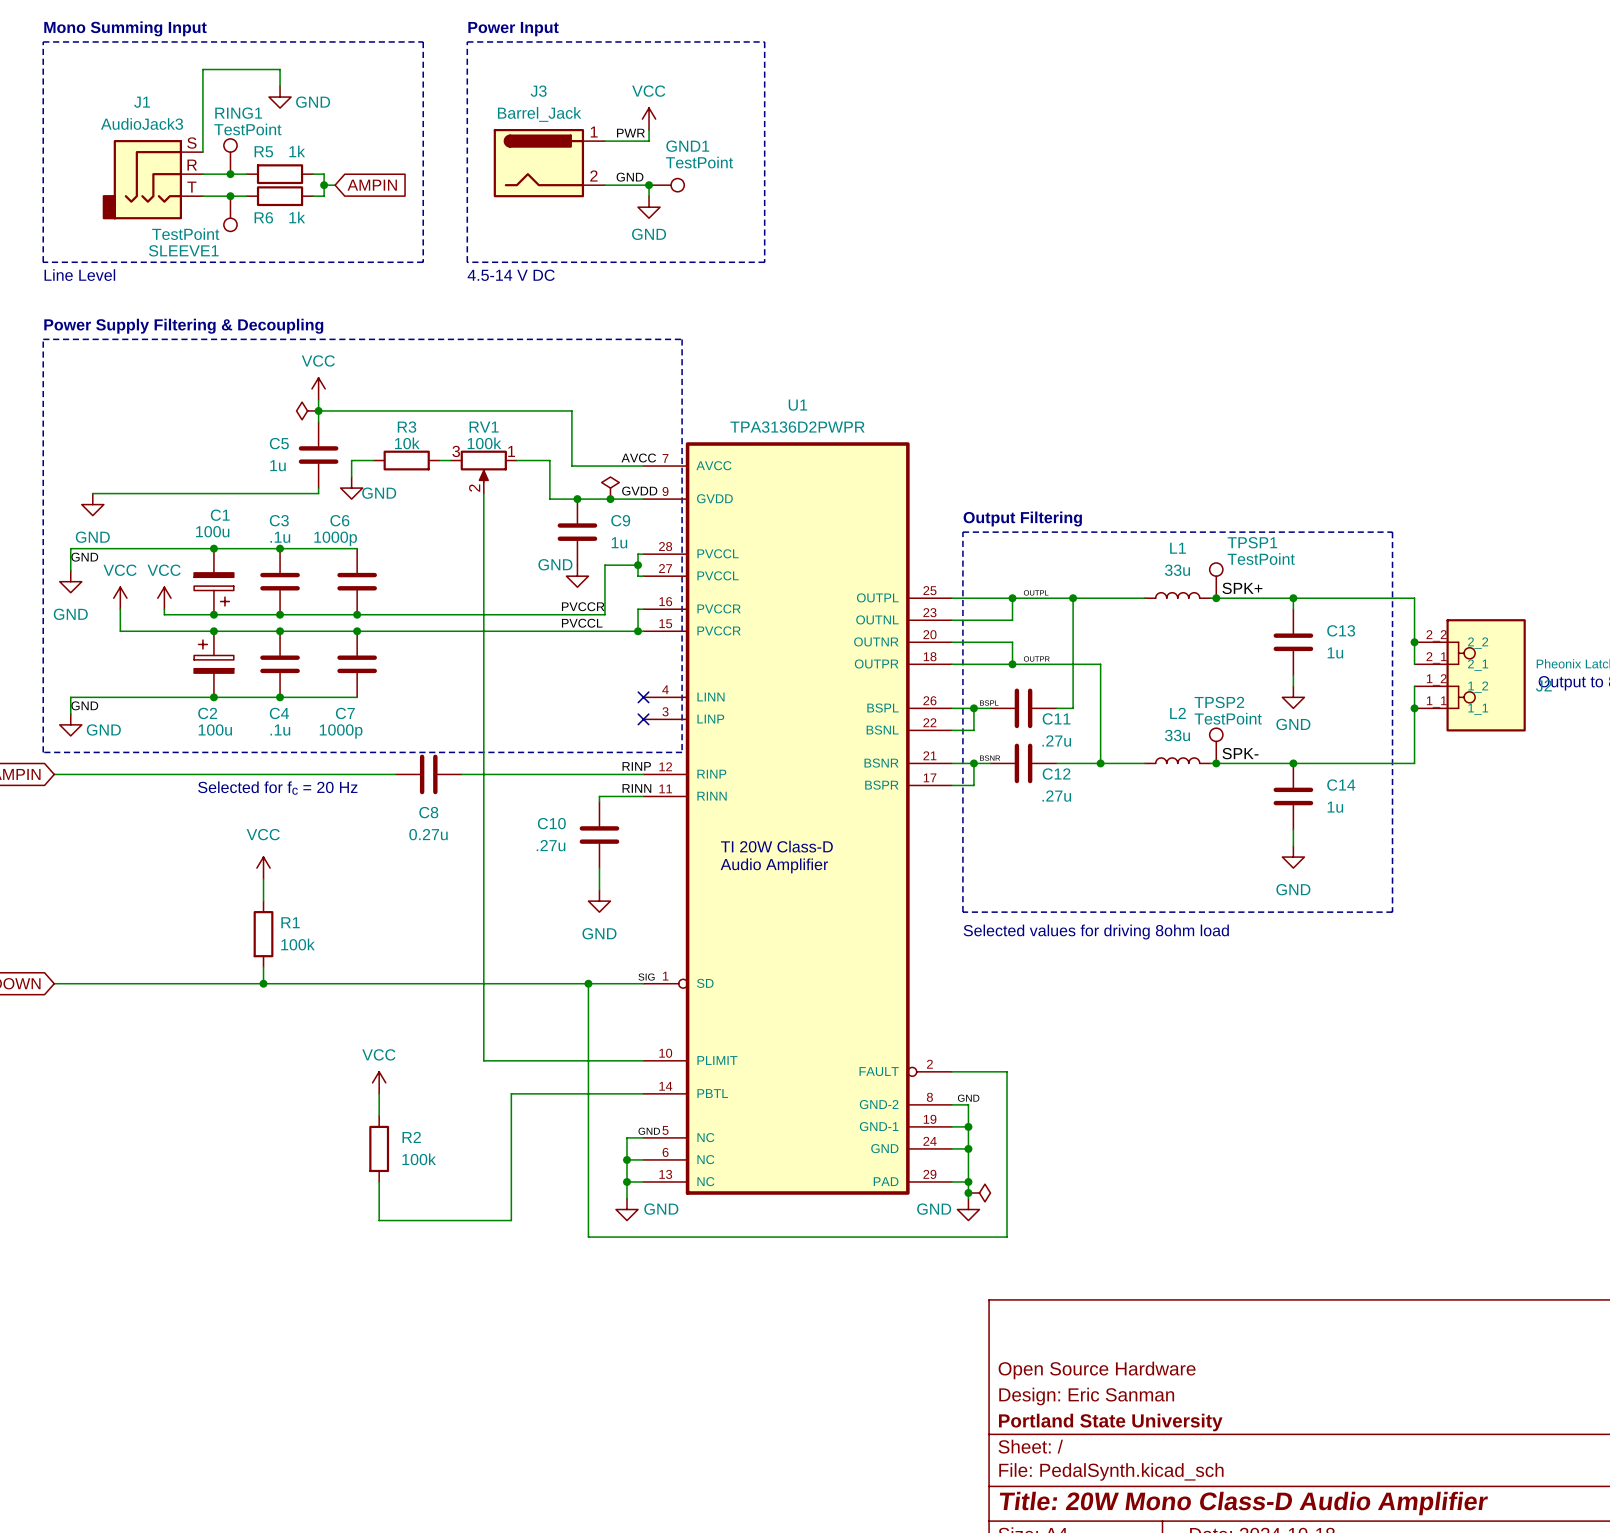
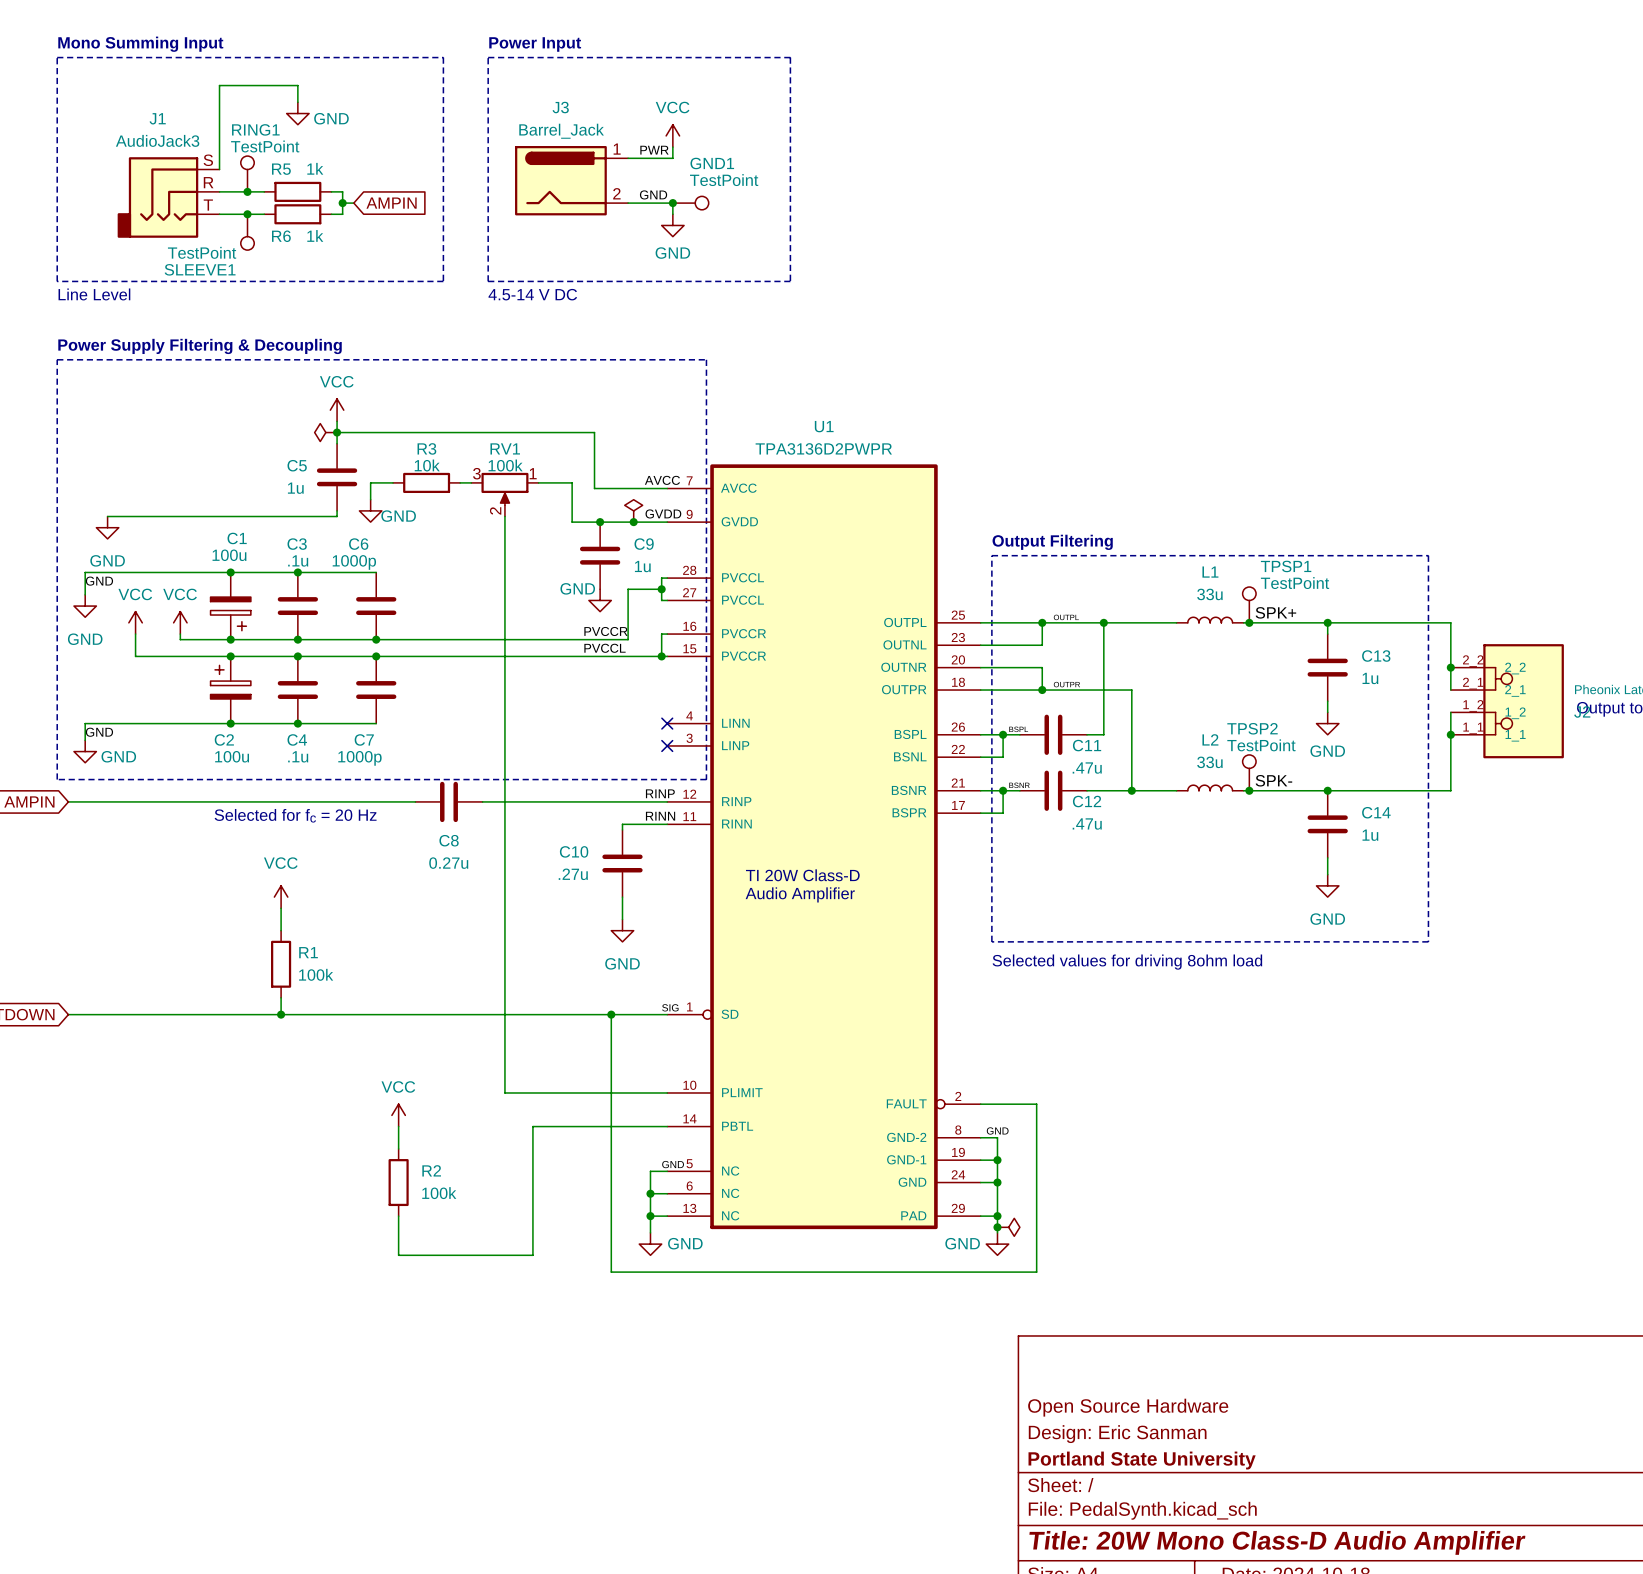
C11 value: .27u (1056, 740) -> .47u (1087, 768)
C12 value: .27u (1056, 796) -> .47u (1087, 824)

